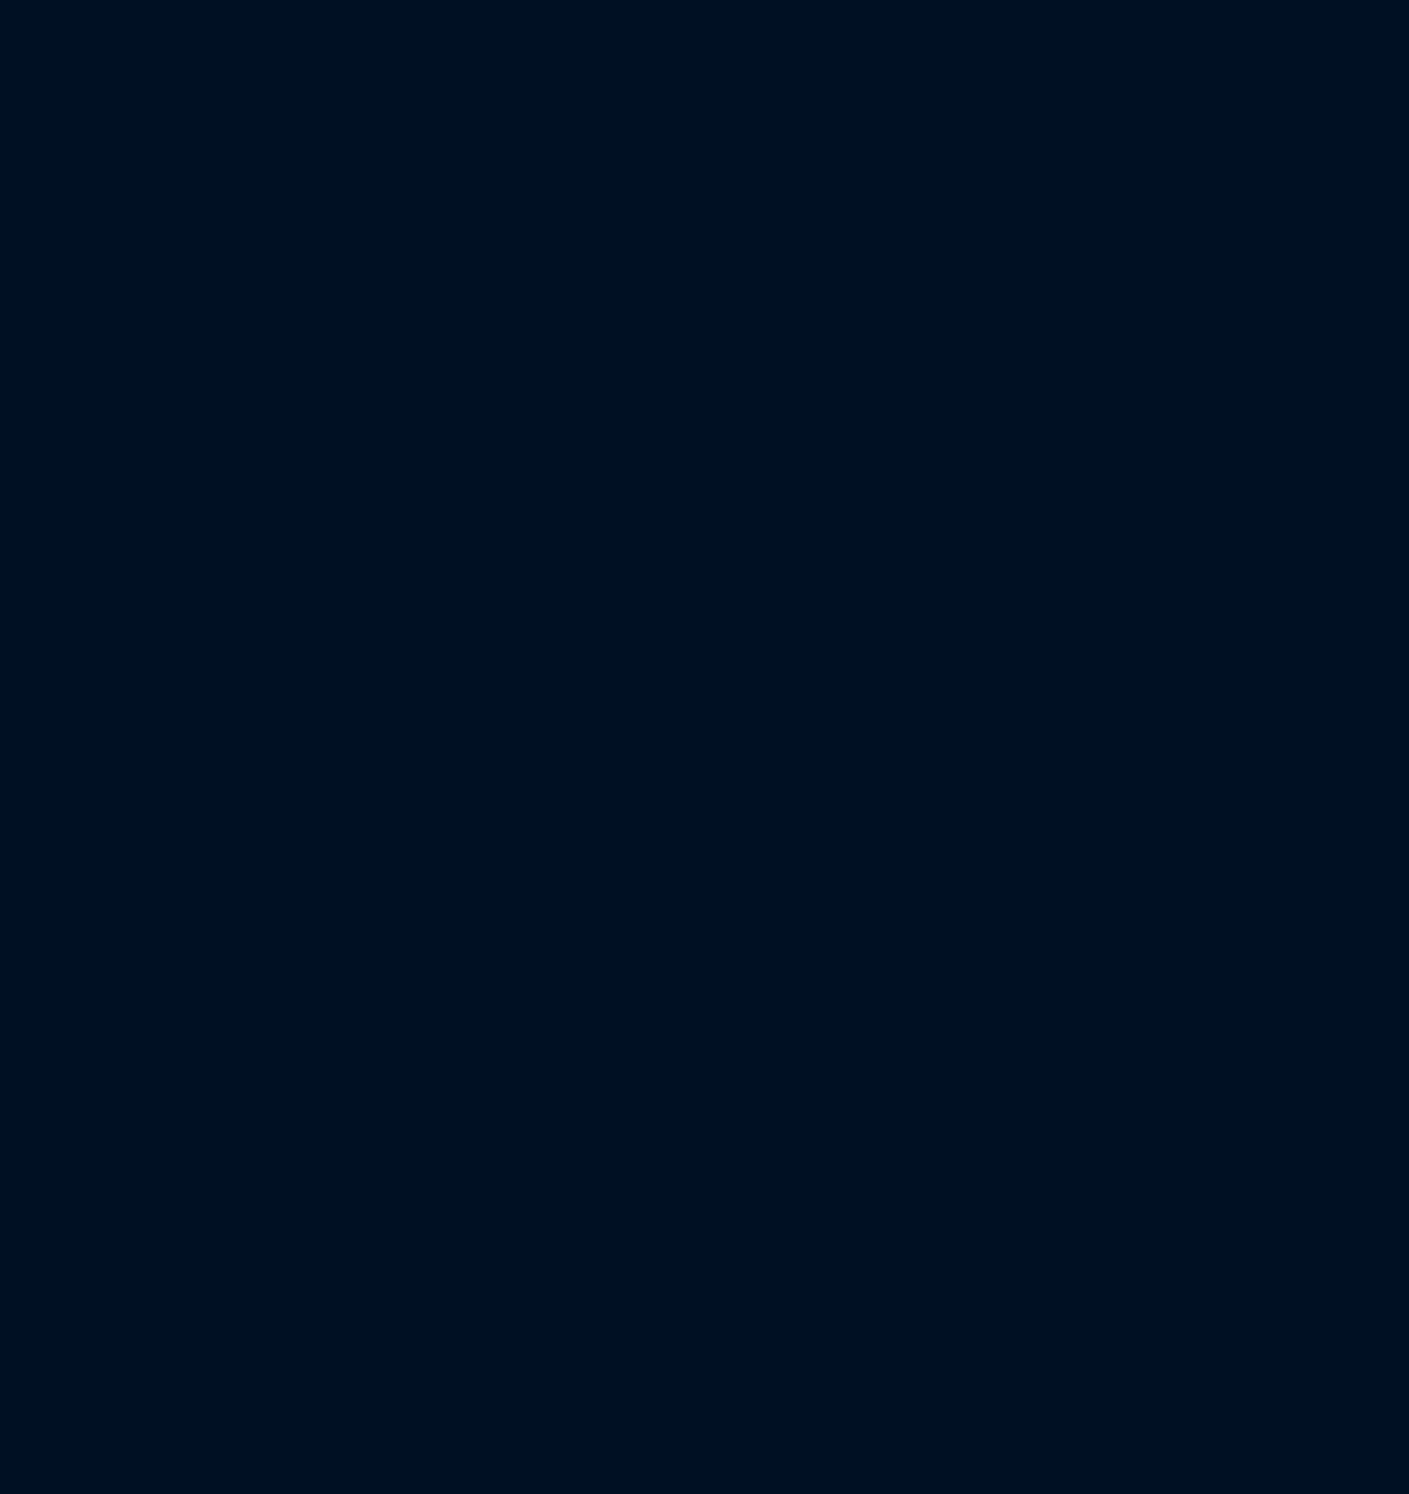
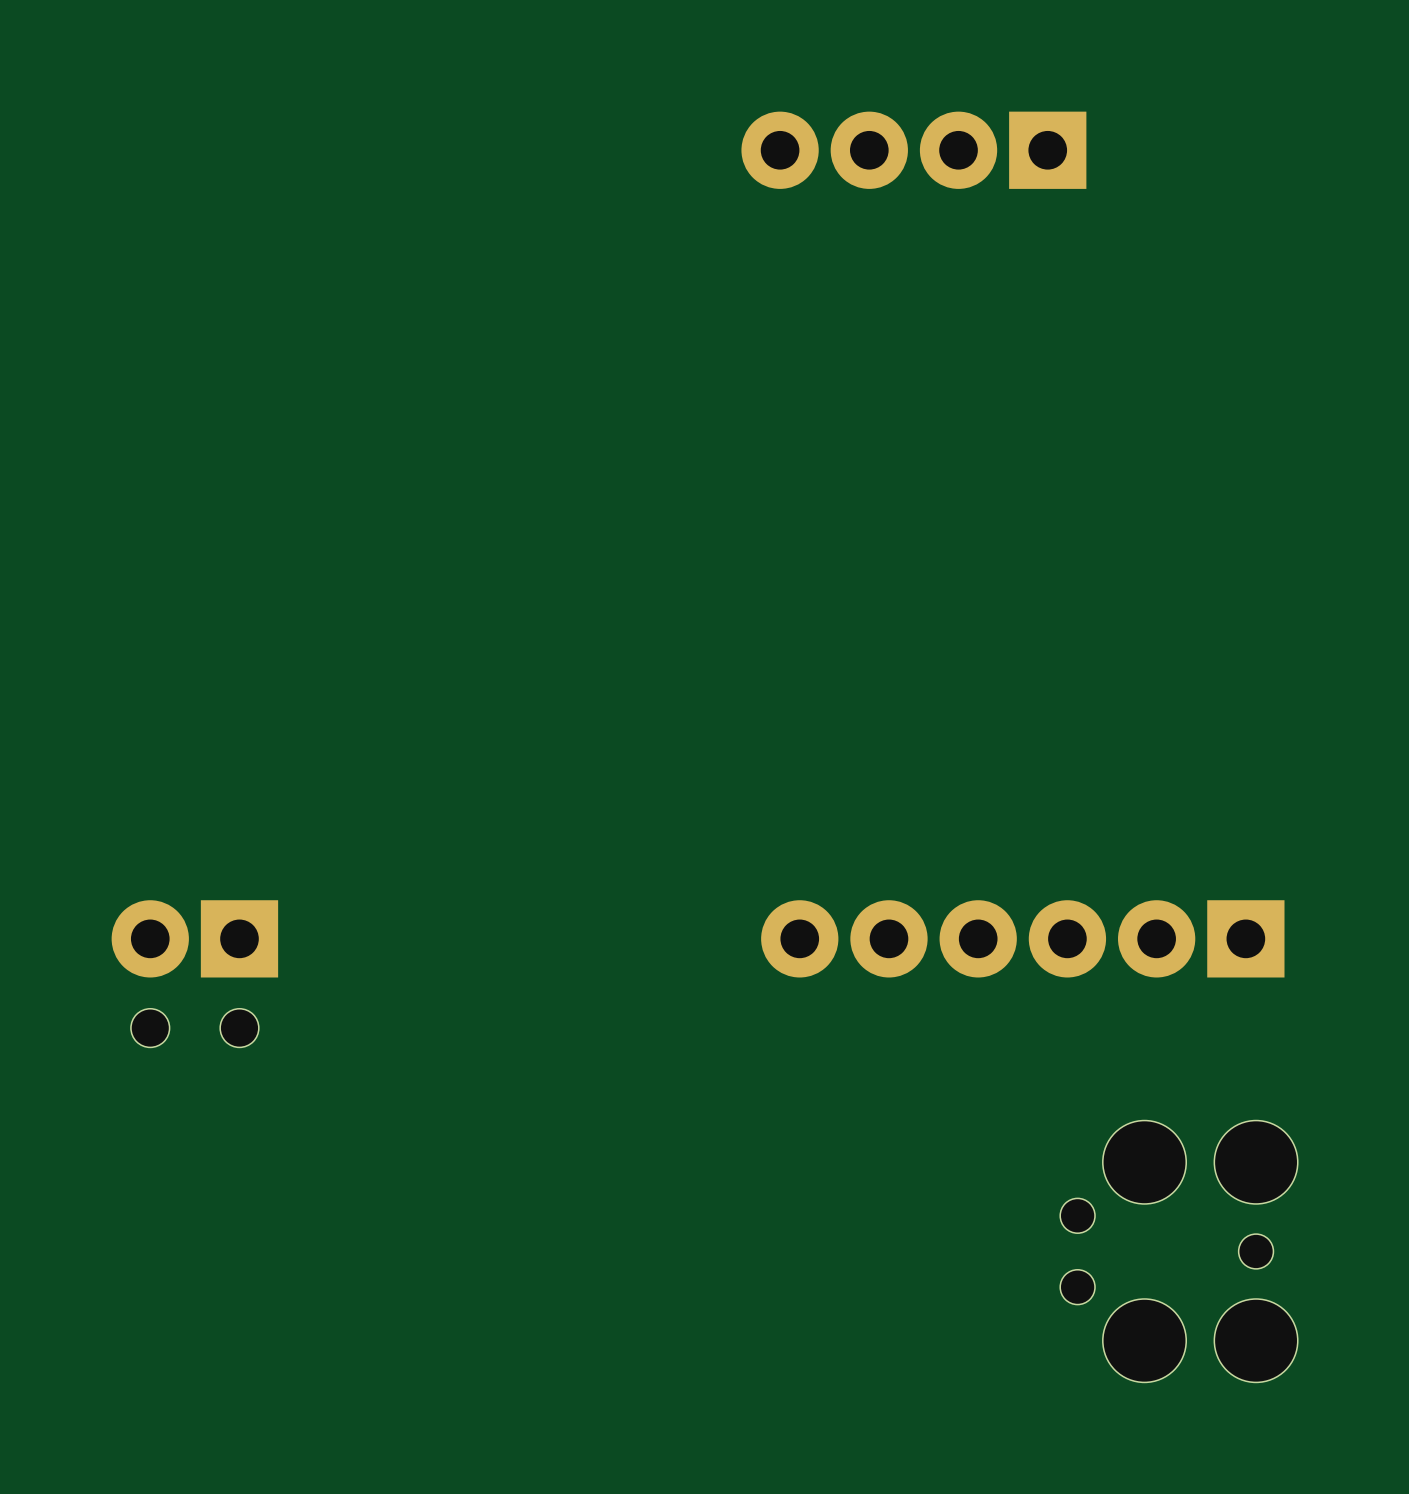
part: none -> (913, 150)
part: none -> (1022, 938)
part: none -> (194, 973)
part: none -> (1178, 1251)

